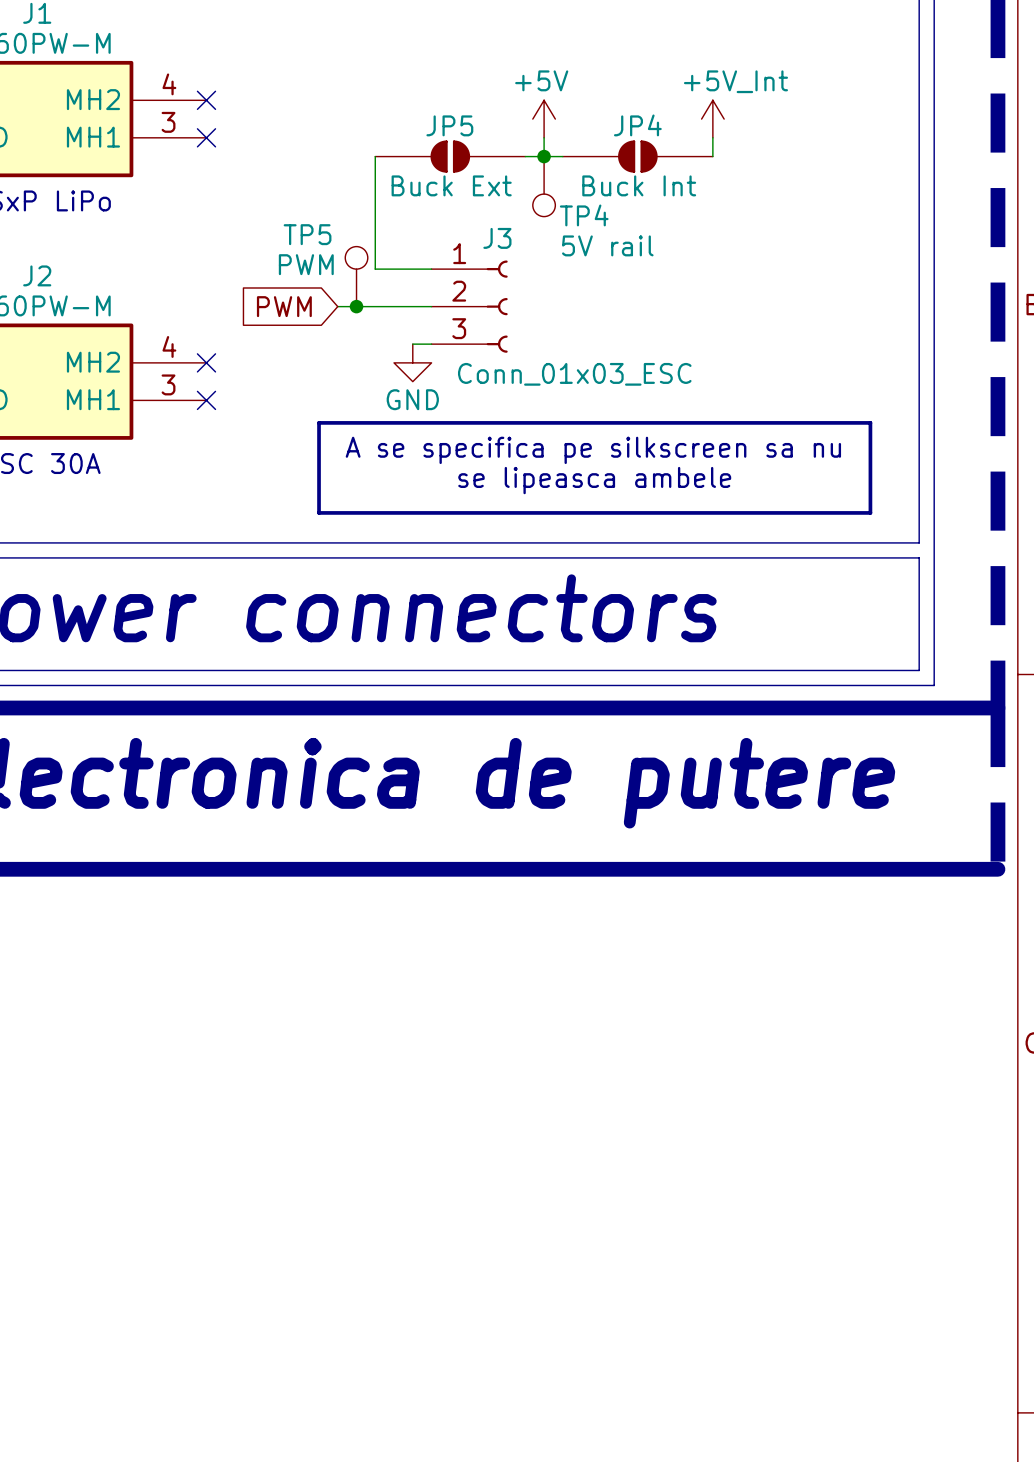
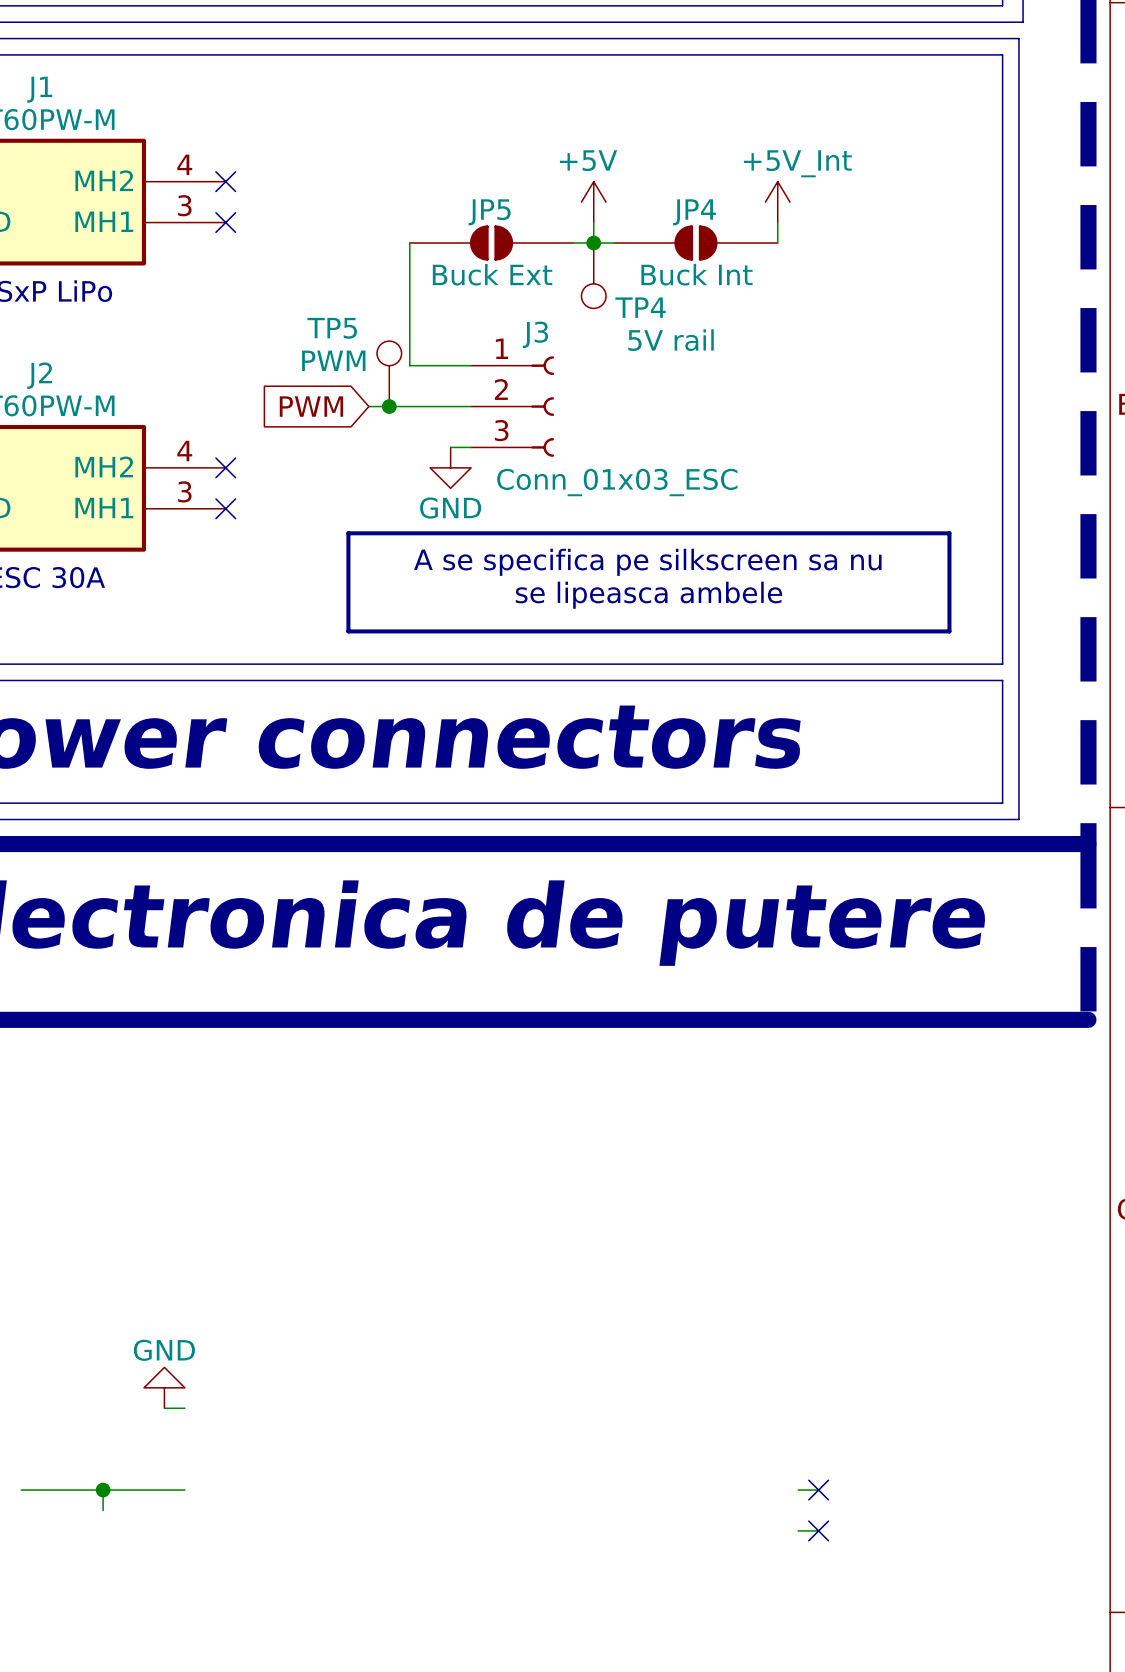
power symbol: none -> GND (164, 1387)
wire: none -> (164, 1408) (184, 1408)
wire: none -> (21, 1490) (184, 1490)
wire: none -> (103, 1490) (103, 1510)
junction: none -> (103, 1490)
wire: none -> (798, 1490) (818, 1490)
no-connect mark: none -> (818, 1490)
wire: none -> (798, 1530) (818, 1530)
no-connect mark: none -> (818, 1530)

